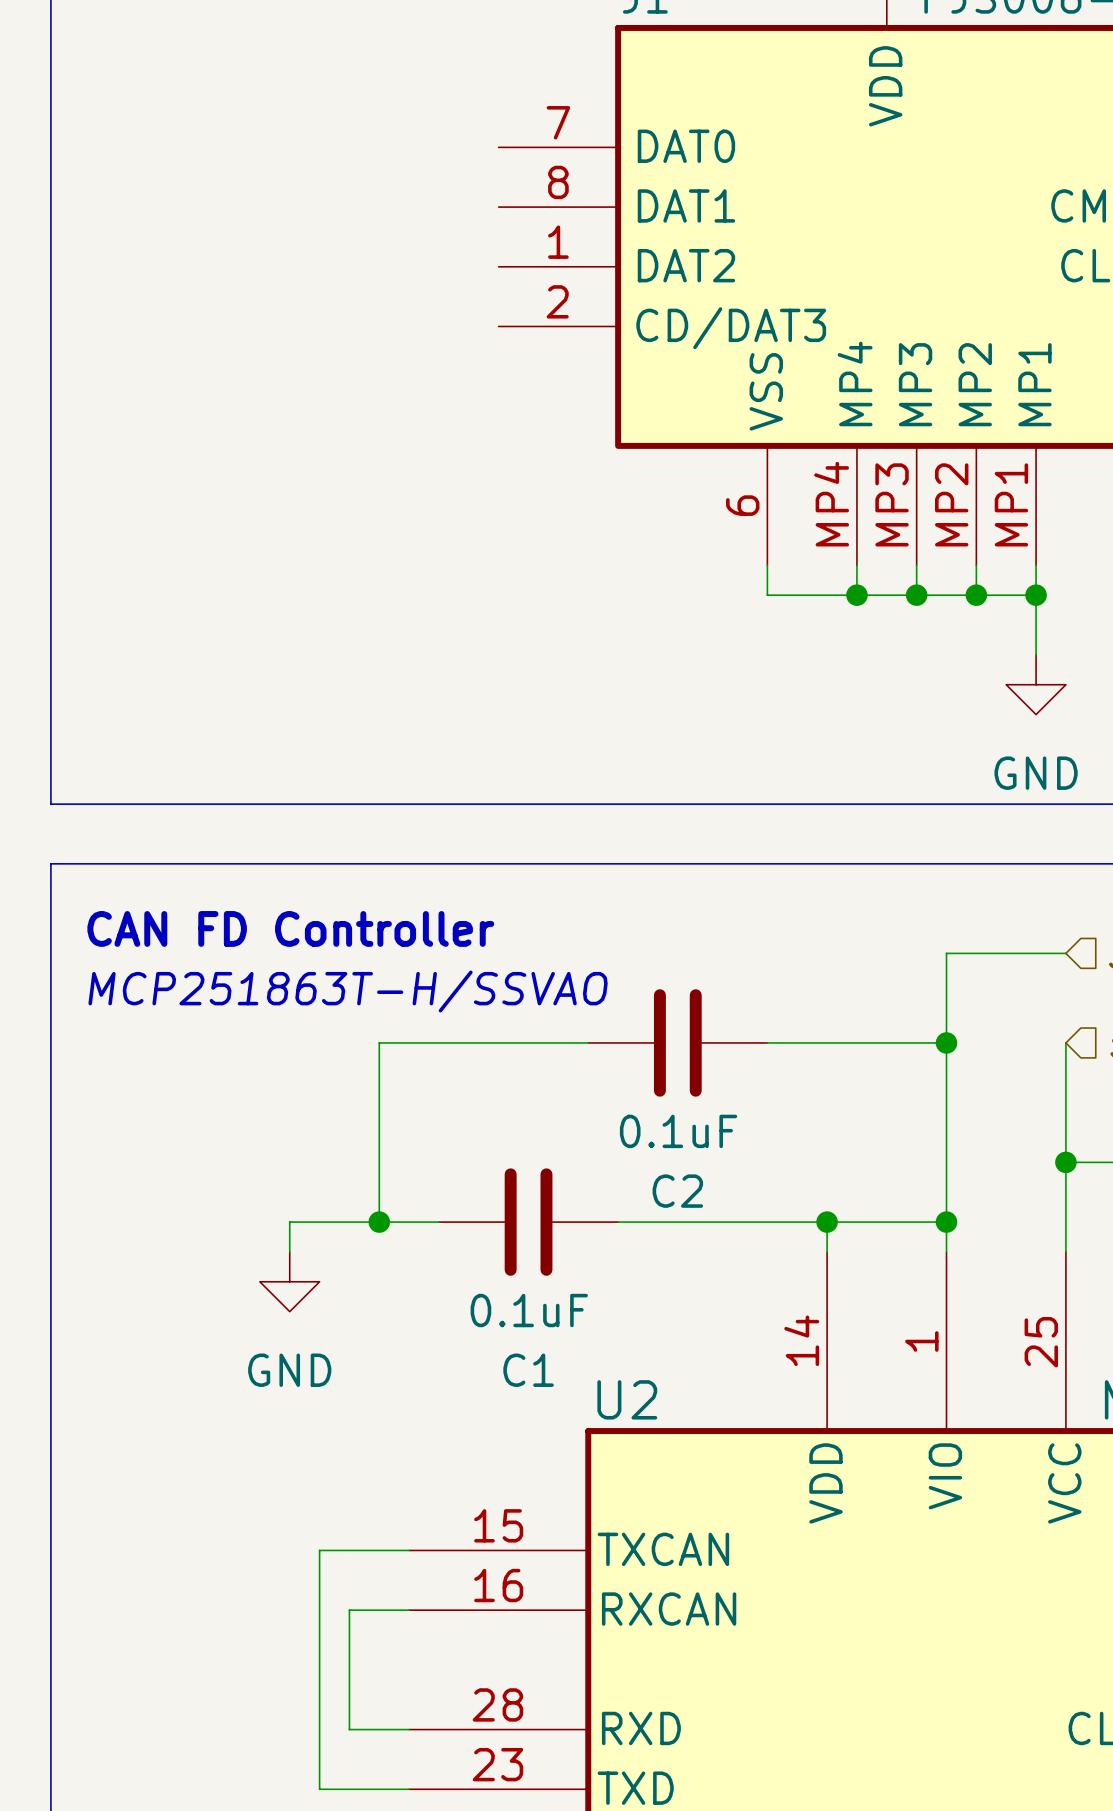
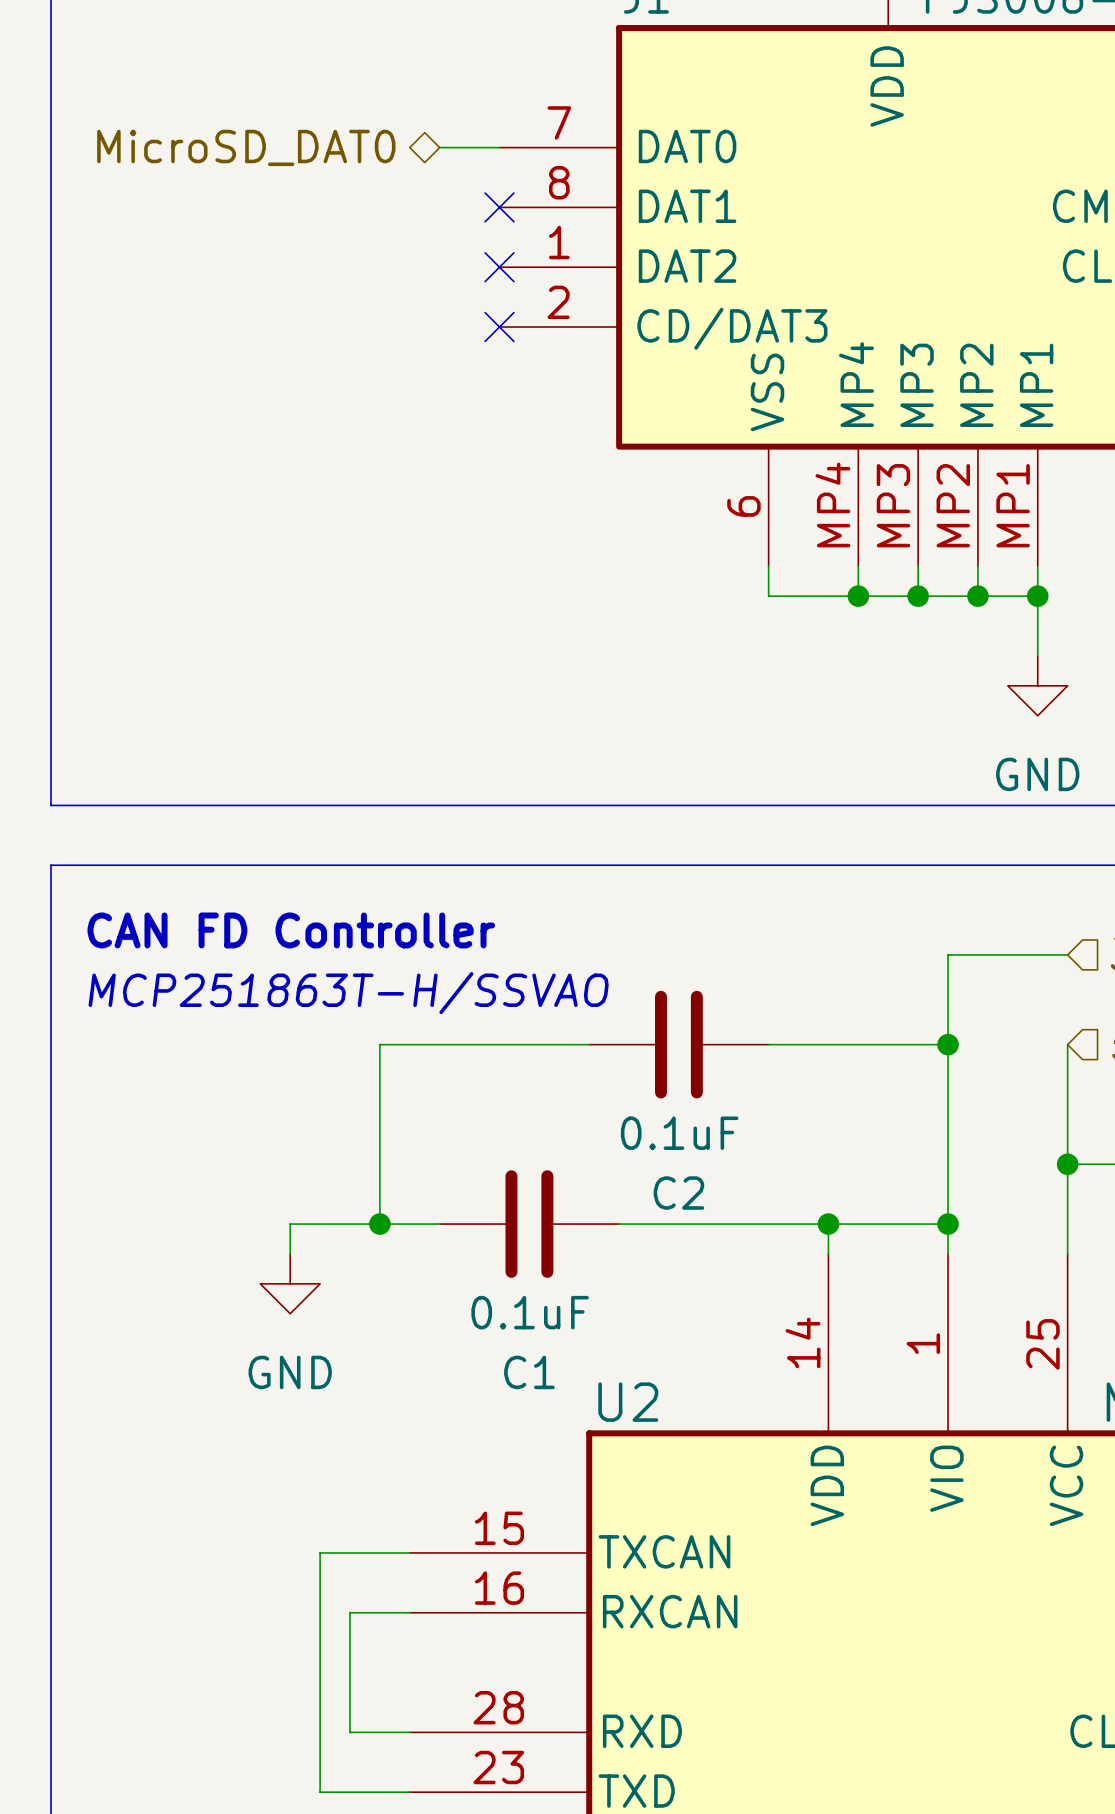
hierarchical label: none -> MicroSD_DAT0 (246, 147)
wire: none -> (439, 147) (499, 147)
no-connect mark: none -> (499, 207)
no-connect mark: none -> (499, 267)
no-connect mark: none -> (499, 327)

